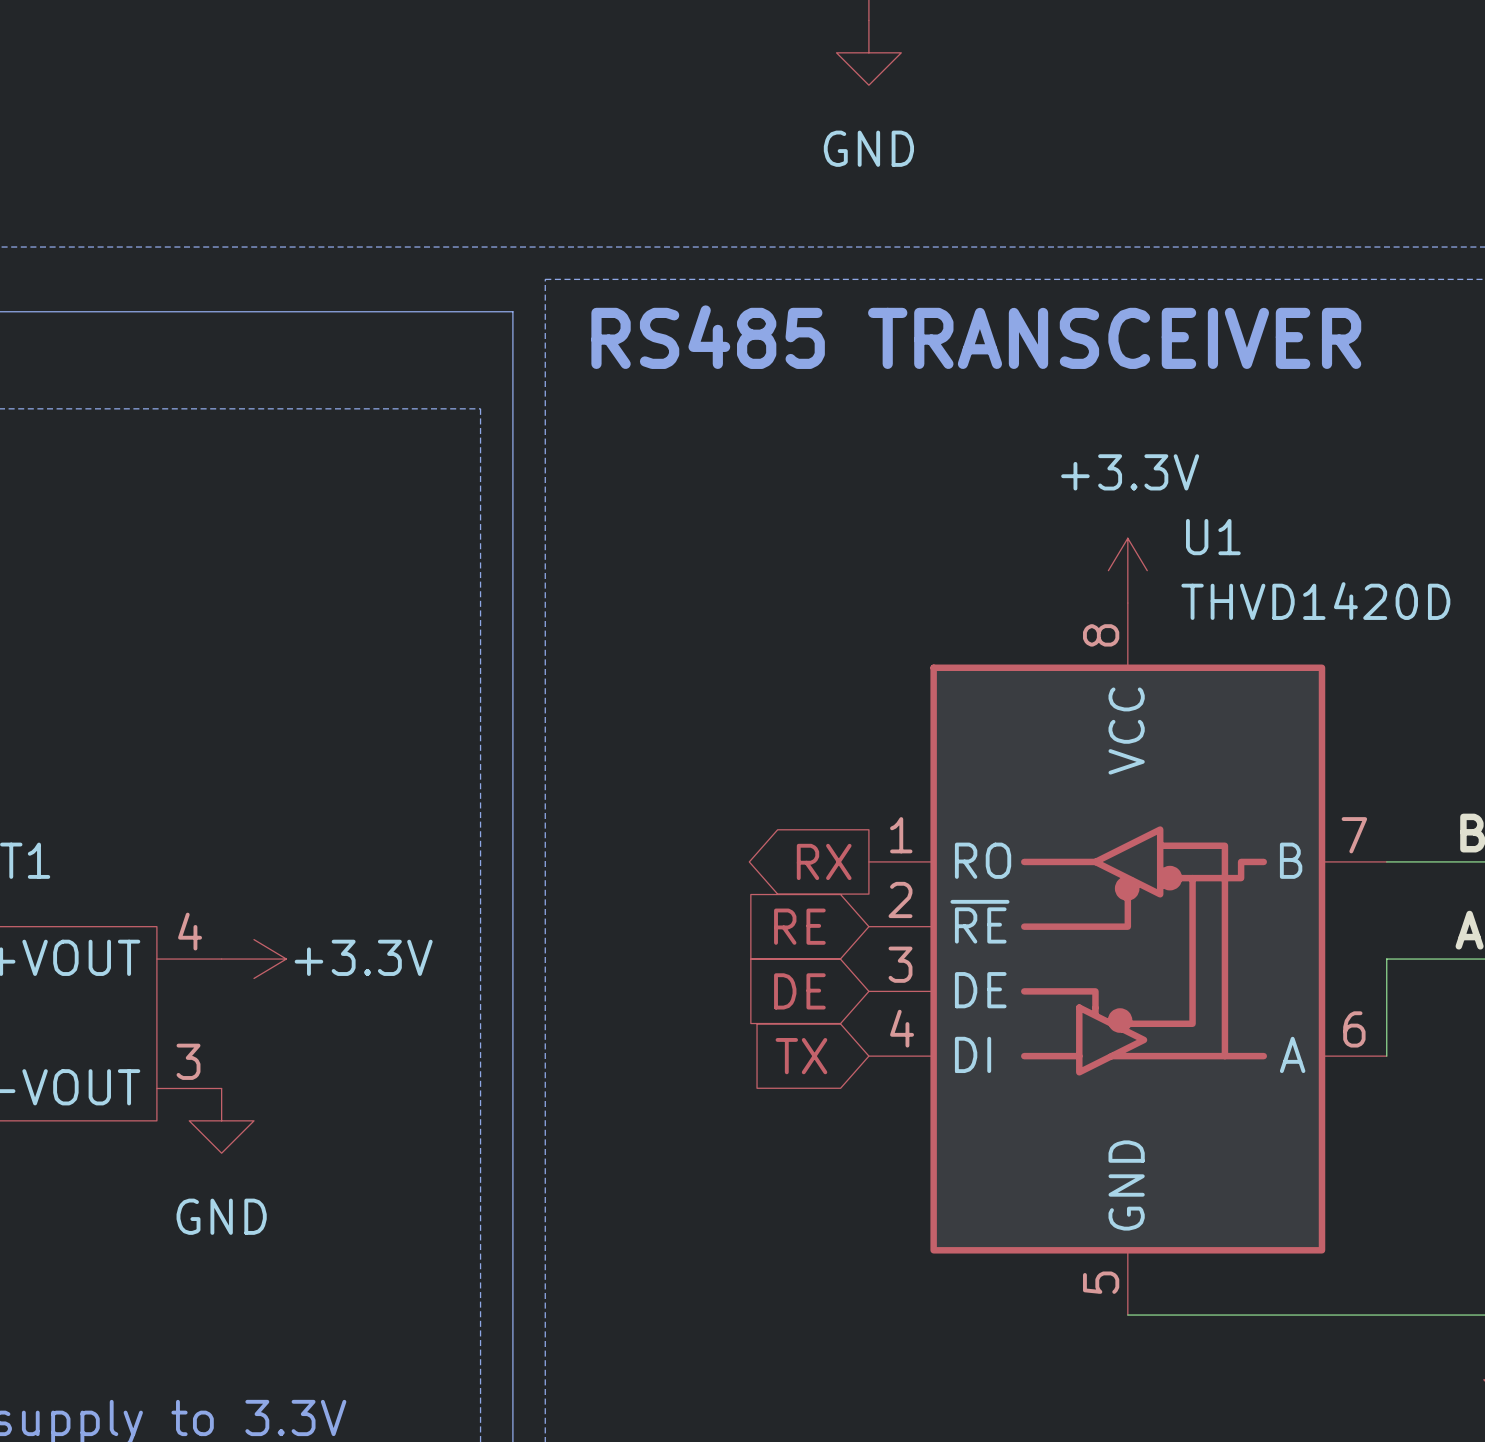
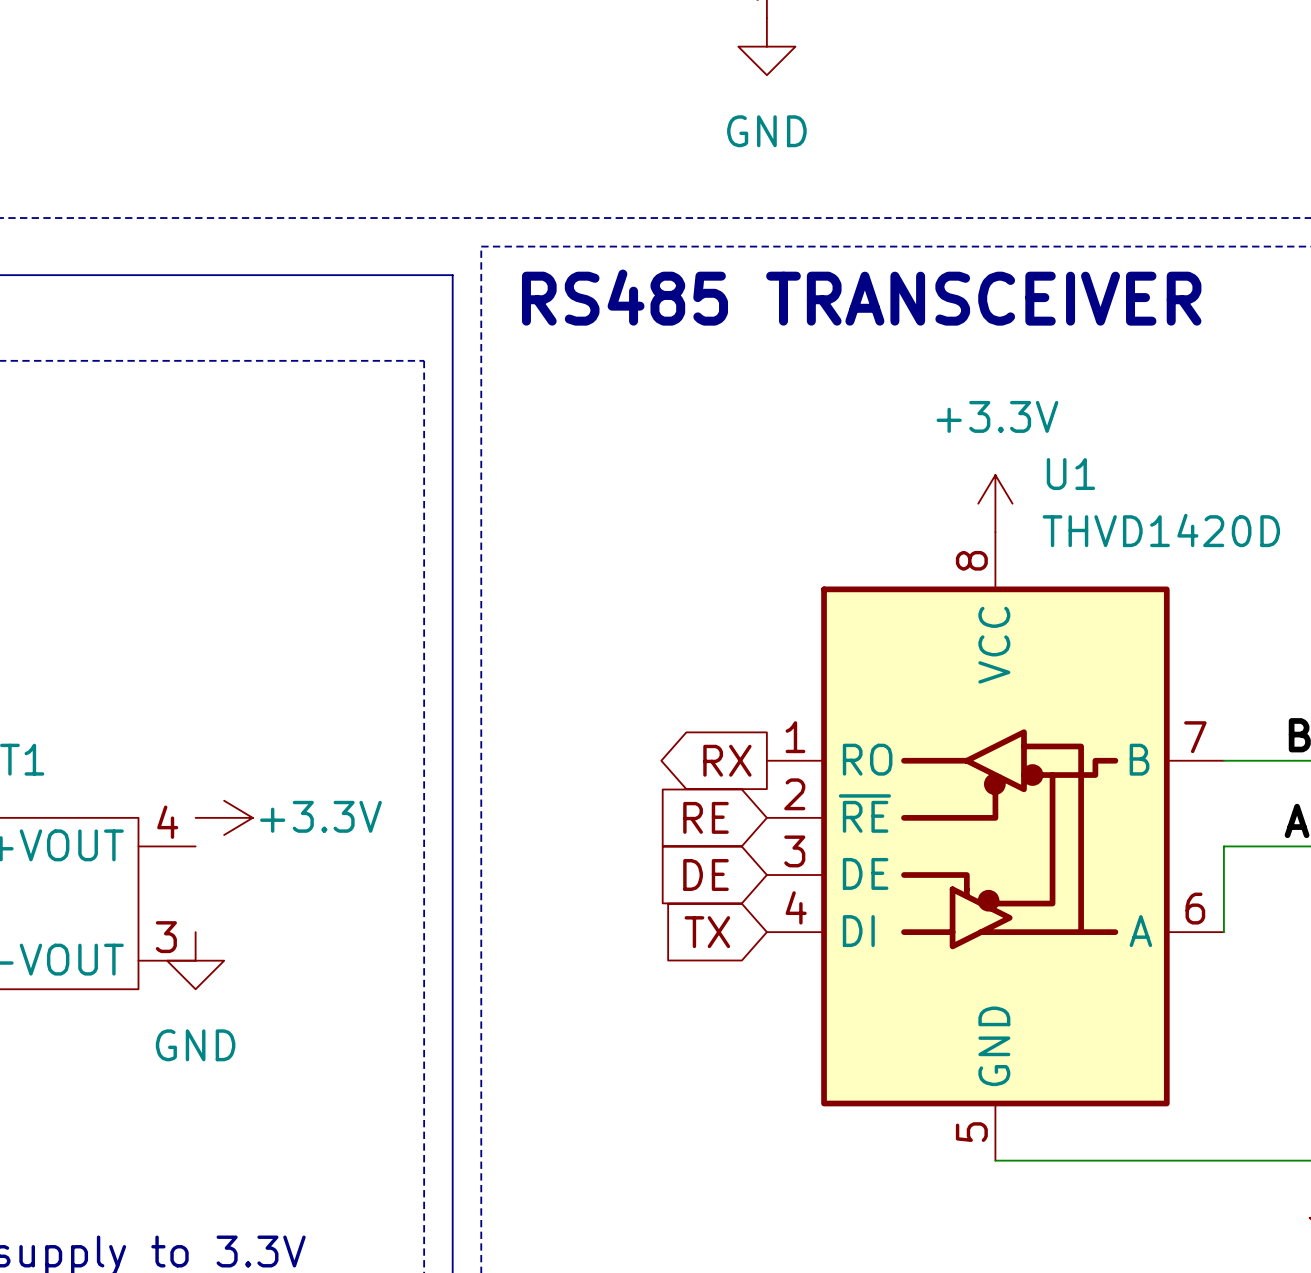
power symbol position: +3.3V (254, 959) -> +3.3V (224, 817)
power symbol position: GND (221, 1120) -> GND (195, 960)

